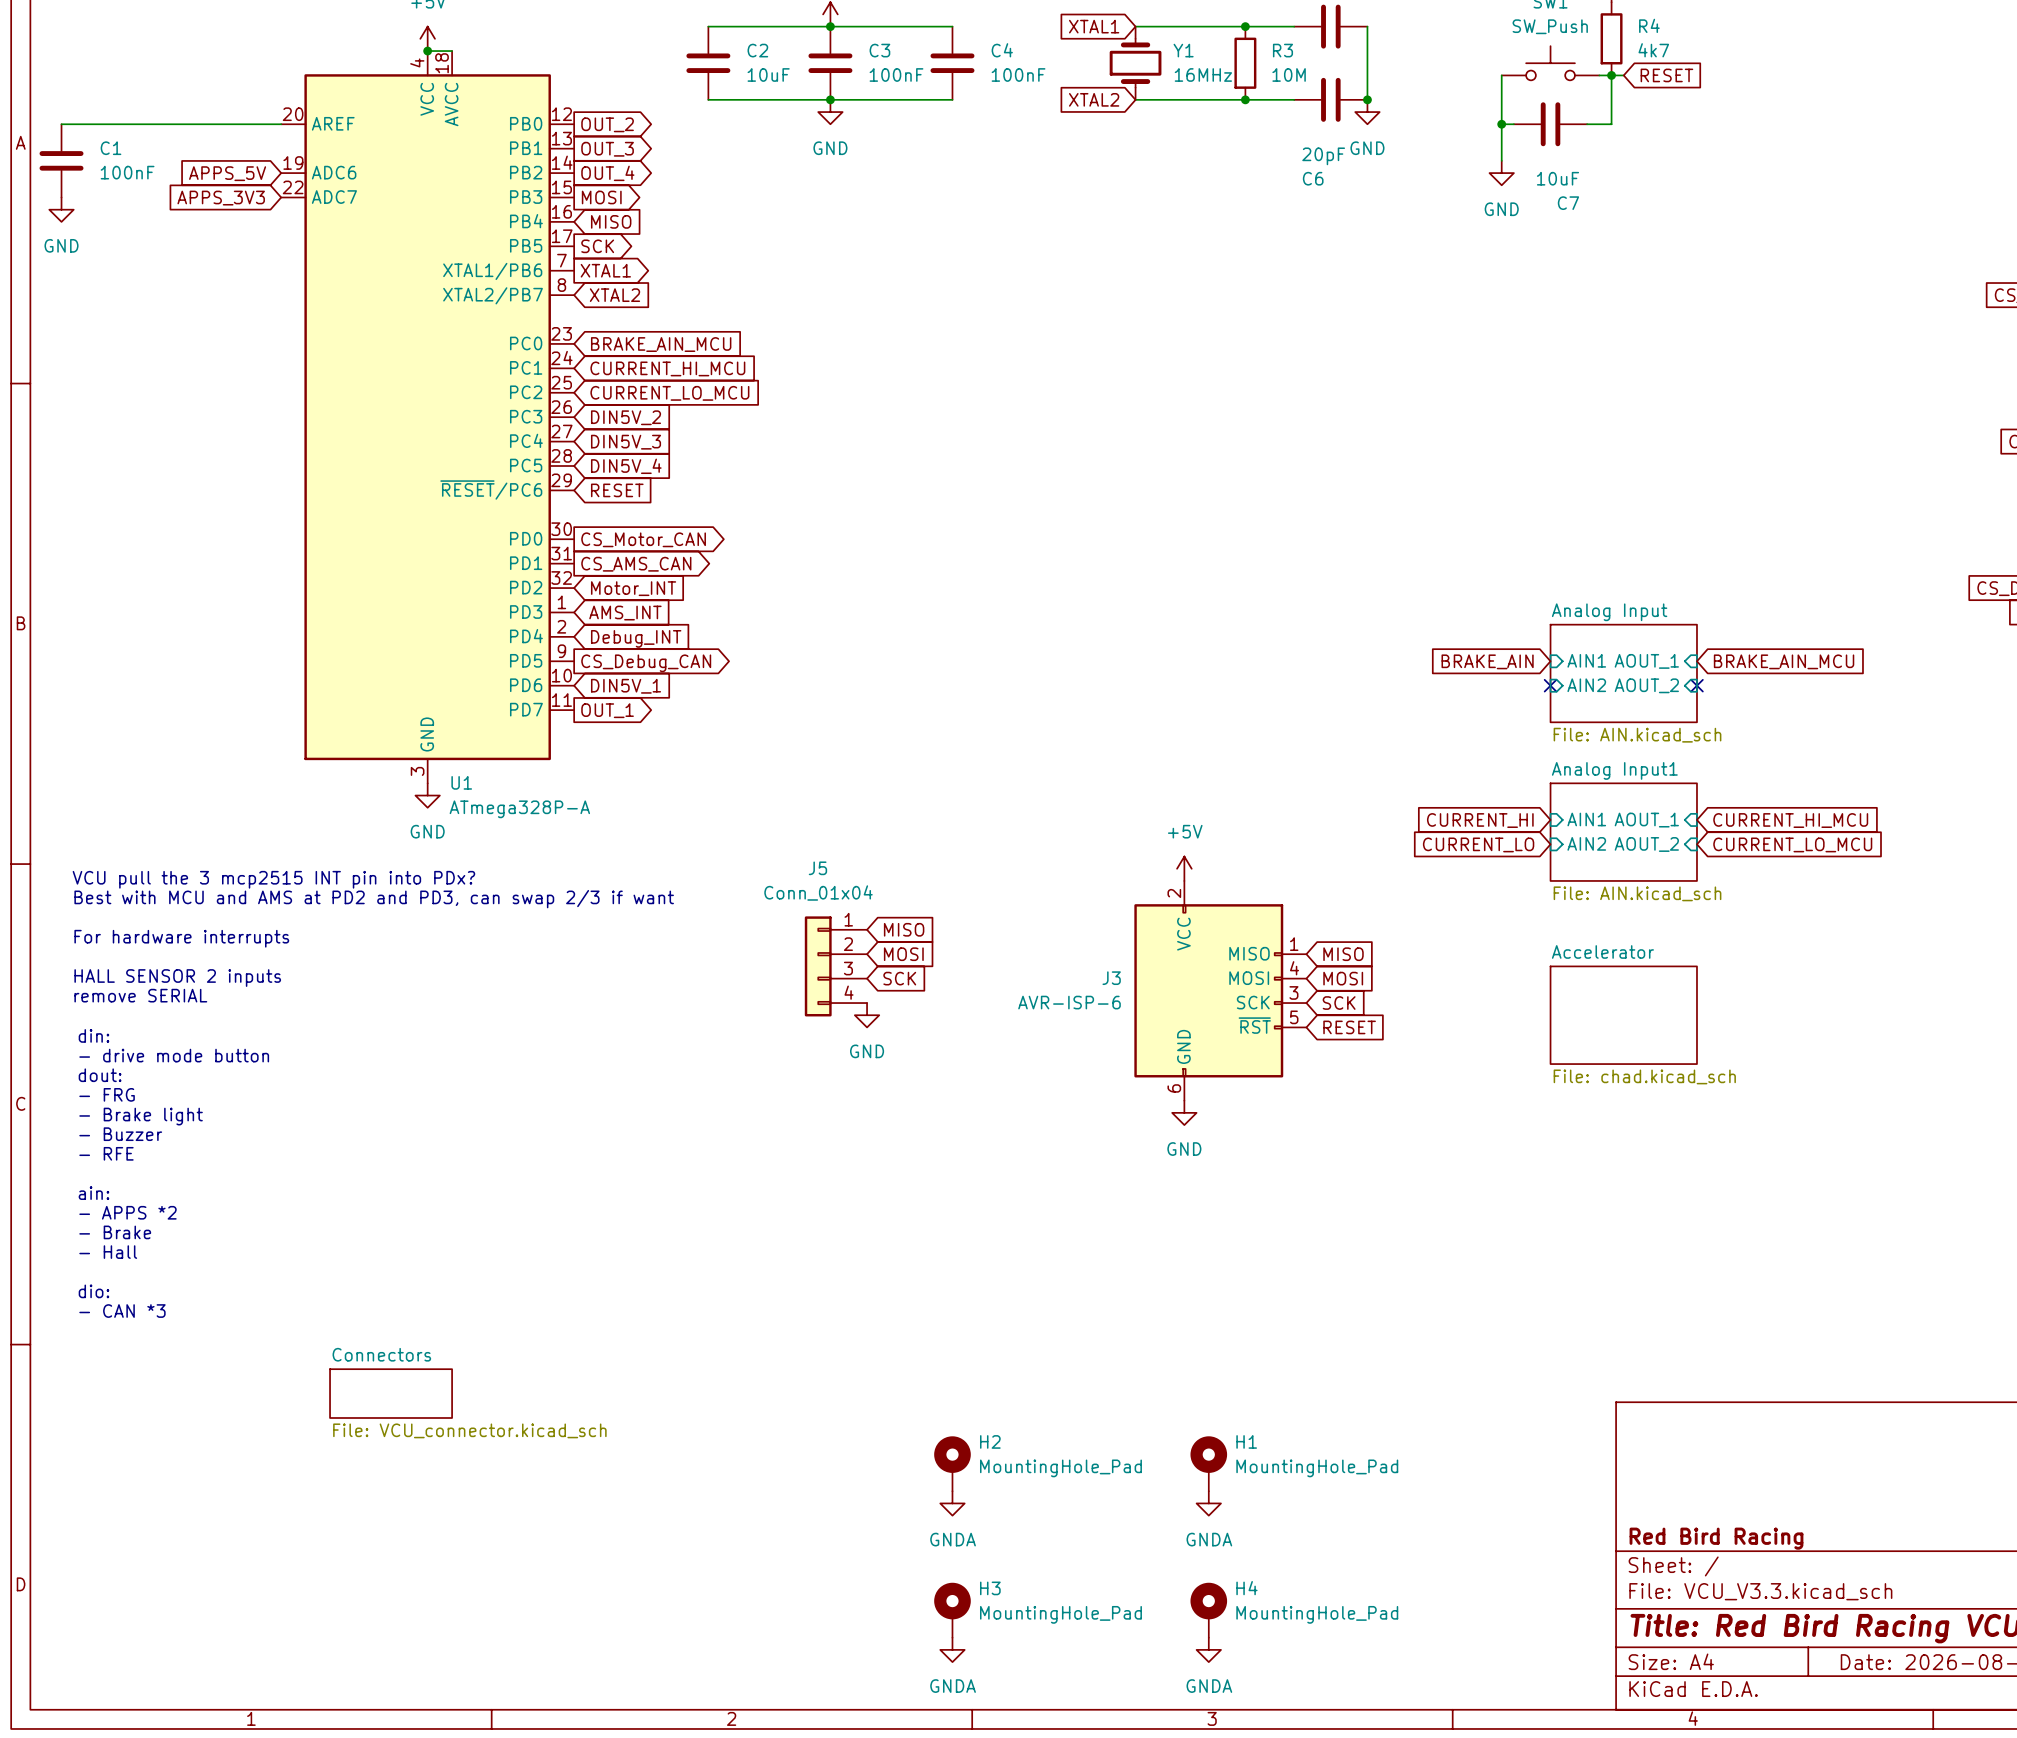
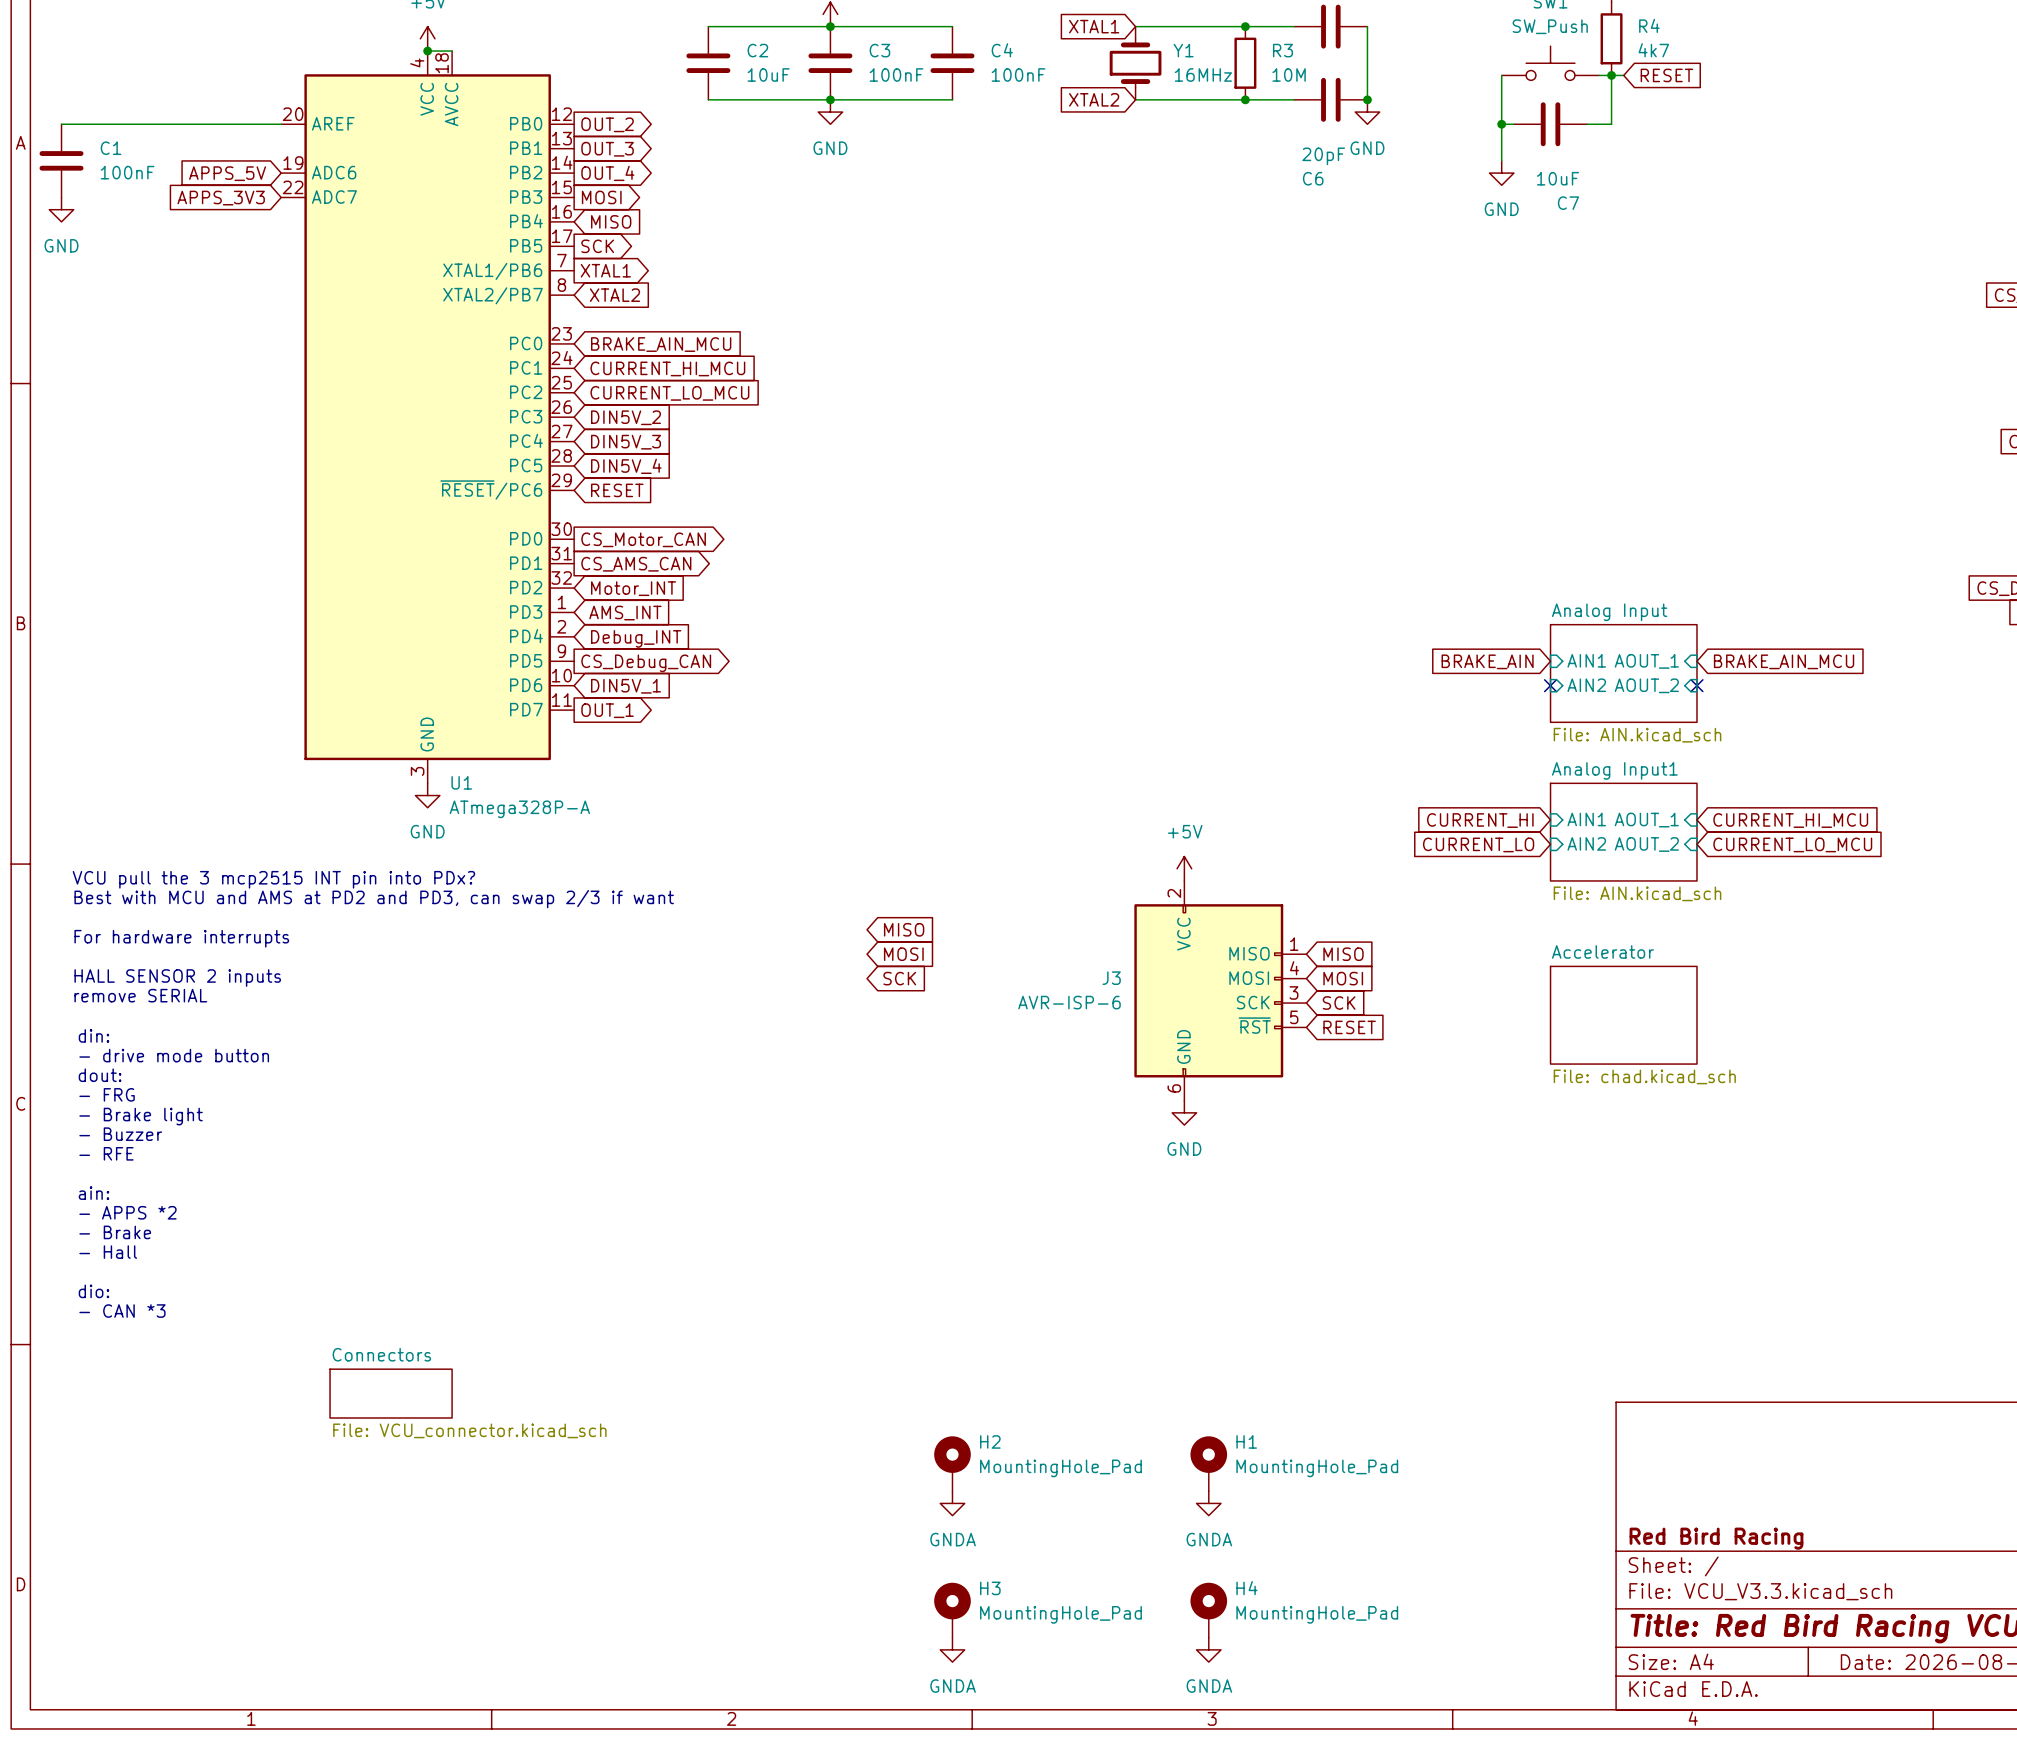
J5: Conn_01x04 (835, 966) -> none
power symbol: GND (867, 1015) -> none

